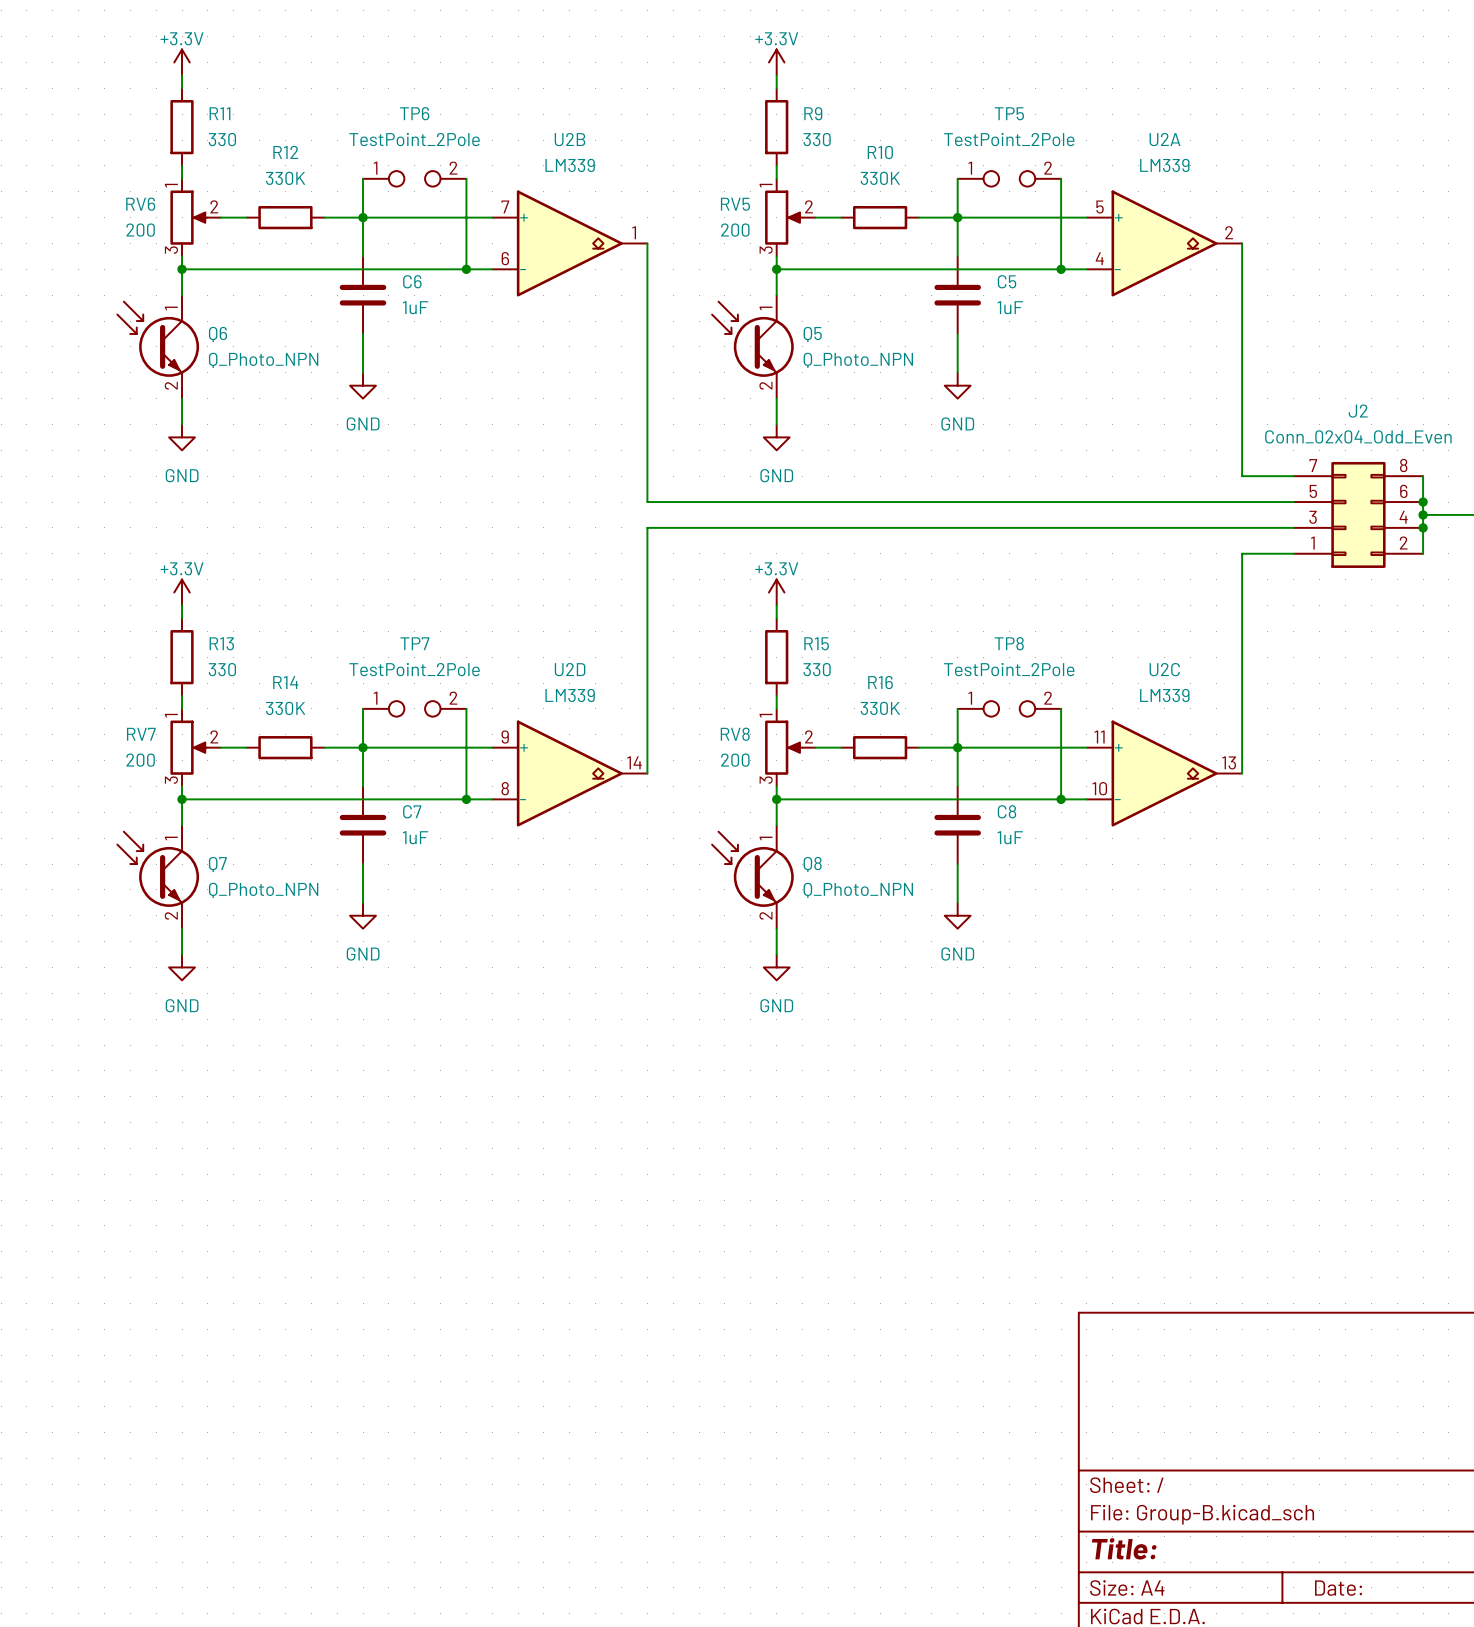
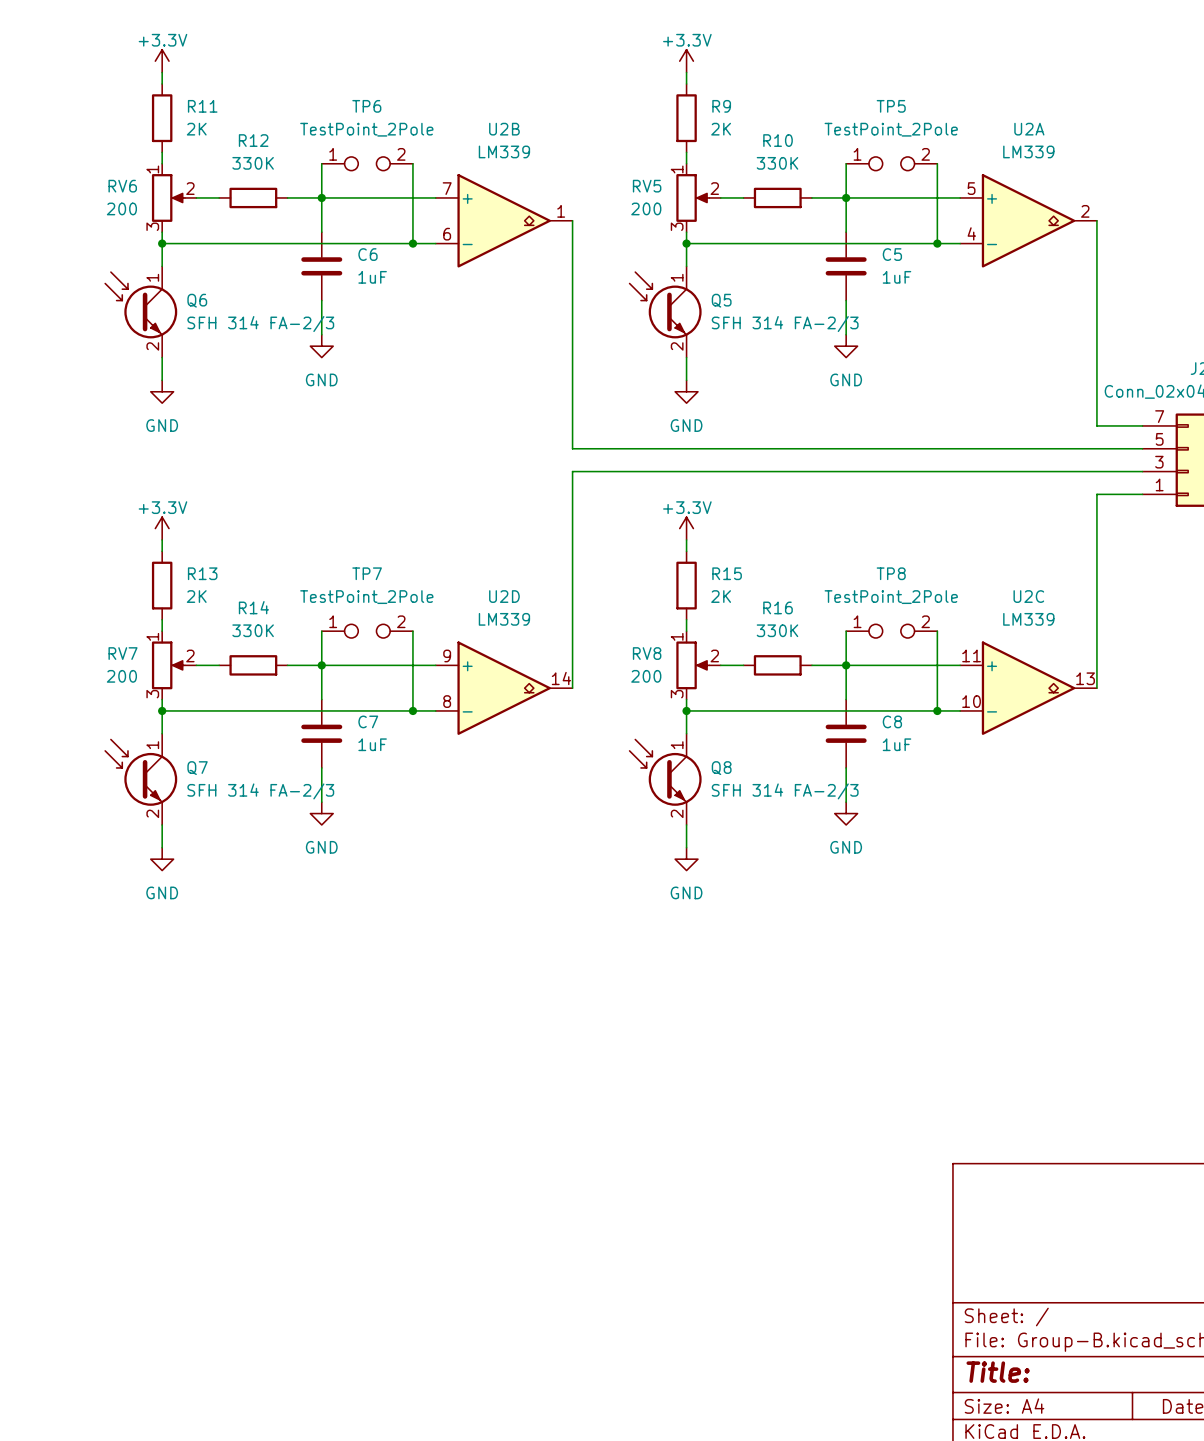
R11 value: 330 (222, 139) -> 2K (196, 129)
R9 value: 330 (817, 139) -> 2K (721, 129)
Q6 value: Q_Photo_NPN (263, 360) -> SFH 314 FA-2/3 (260, 324)
Q5 value: Q_Photo_NPN (858, 360) -> SFH 314 FA-2/3 (785, 324)
R13 value: 330 (222, 669) -> 2K (196, 596)
R15 value: 330 (817, 669) -> 2K (721, 596)
Q7 value: Q_Photo_NPN (263, 890) -> SFH 314 FA-2/3 (260, 791)
Q8 value: Q_Photo_NPN (858, 890) -> SFH 314 FA-2/3 (785, 791)

